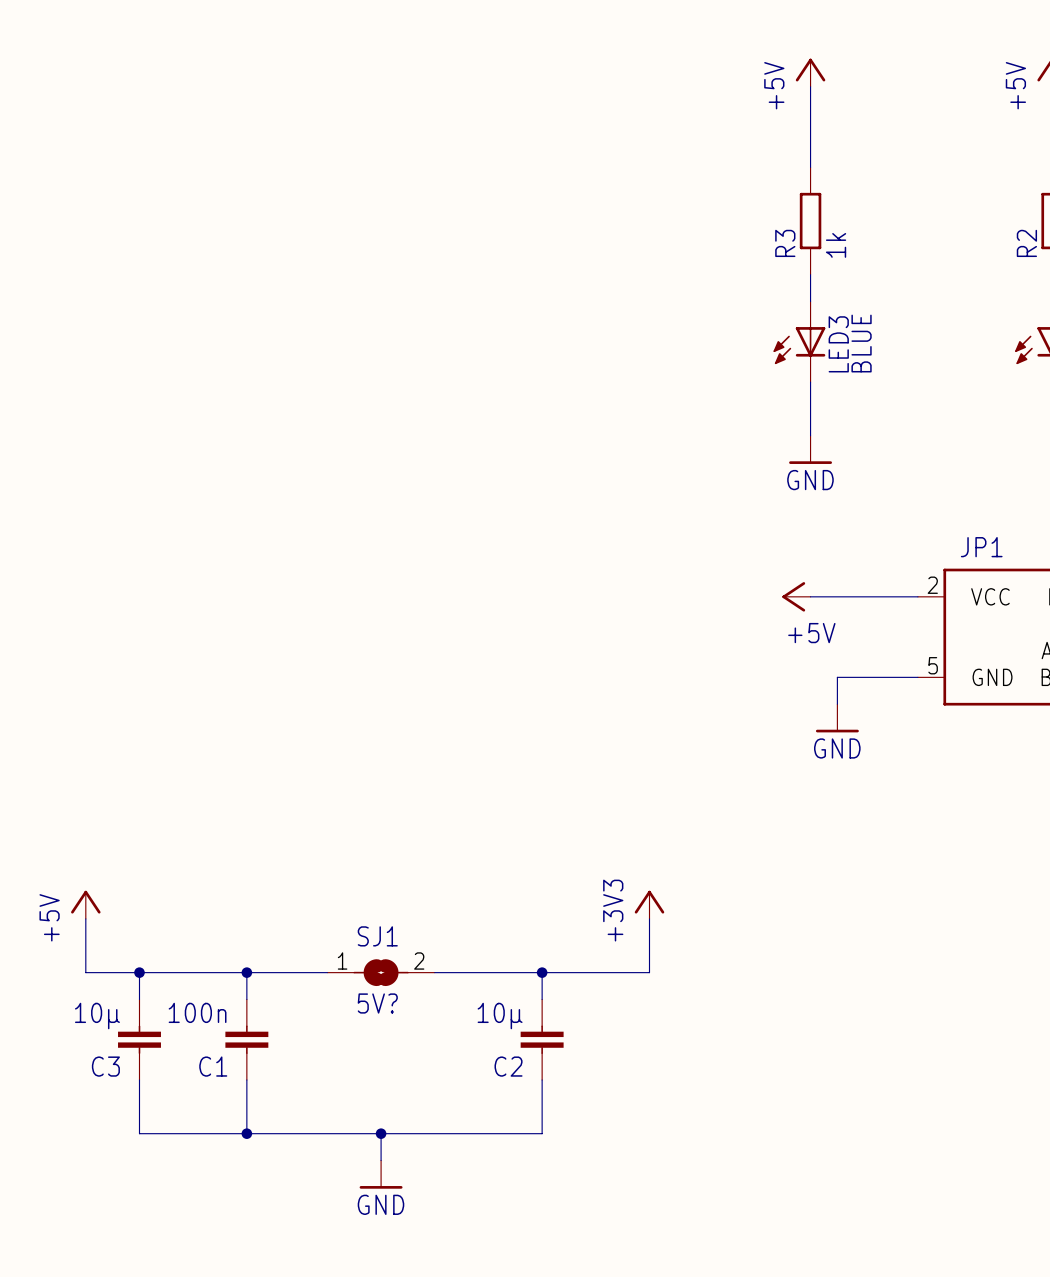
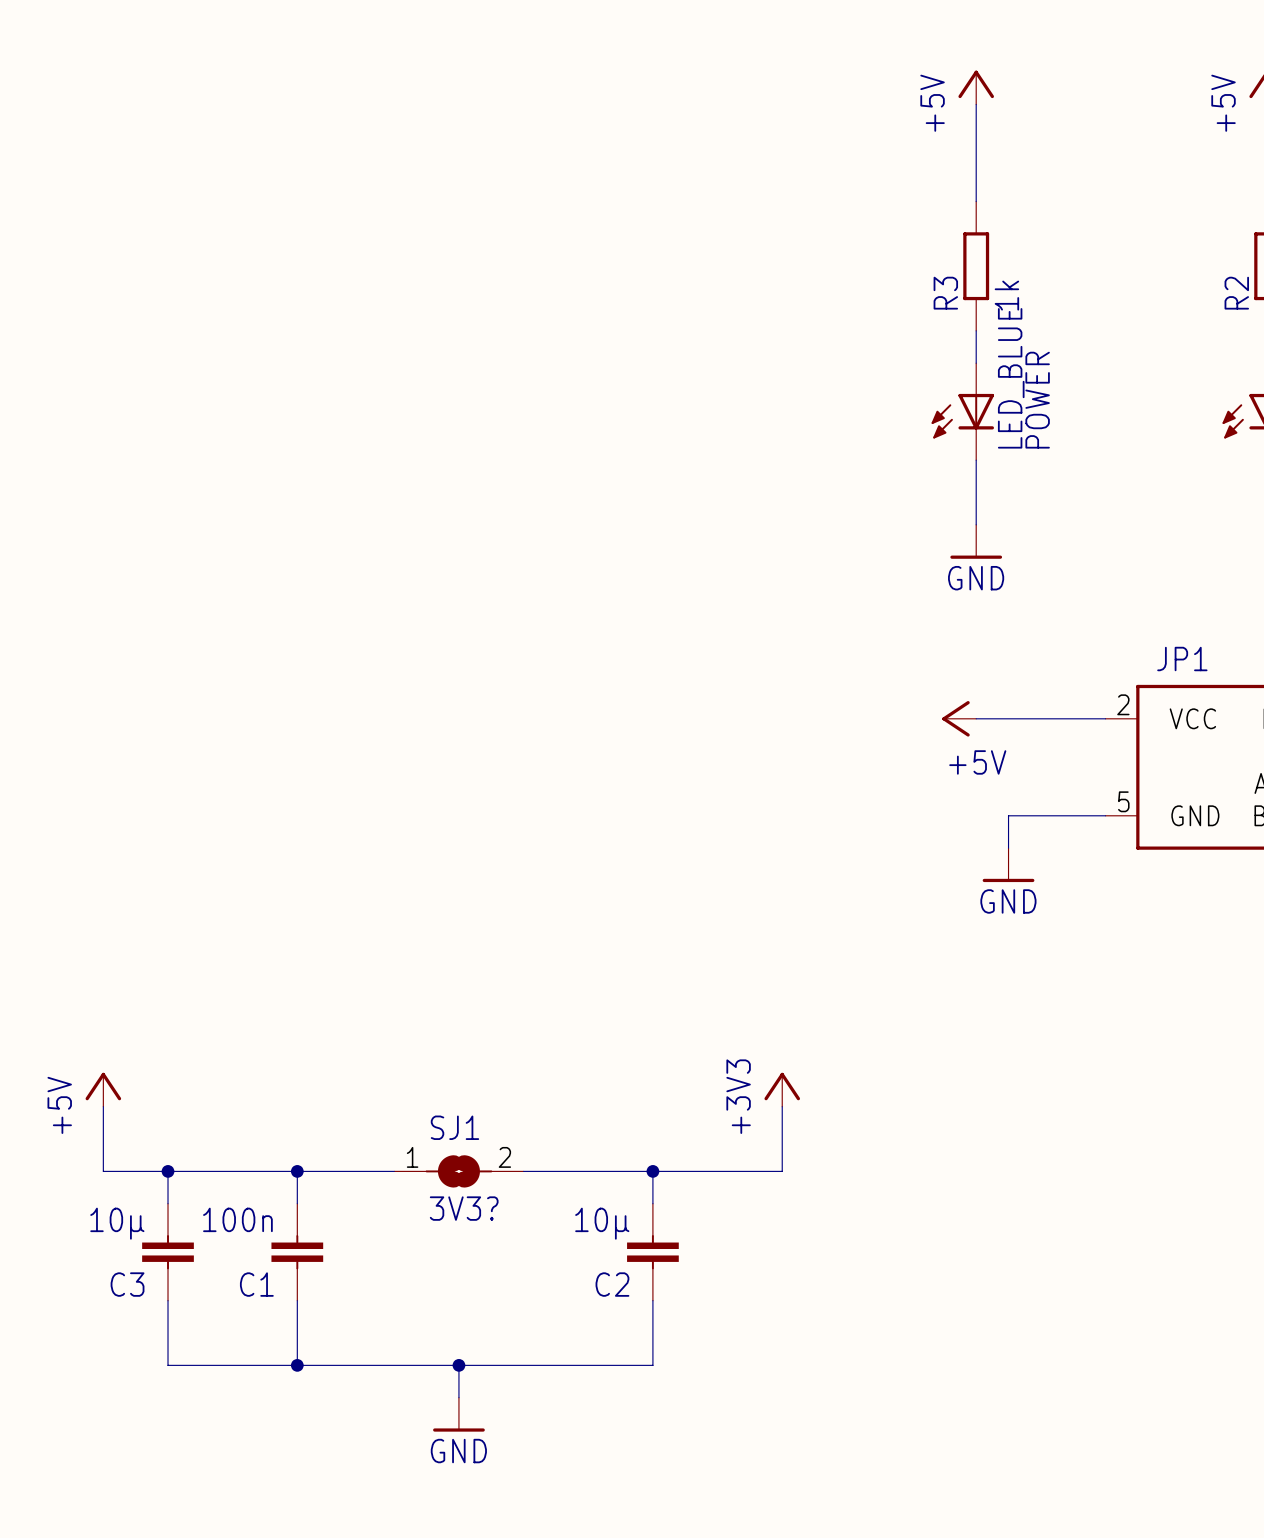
LED3 value: BLUE (861, 343) -> POWER (1037, 400)
LED3 name: LED3 (838, 344) -> LED_BLUE (1011, 378)
SJ1 value: 5V? (377, 1003) -> 3V3? (464, 1208)

